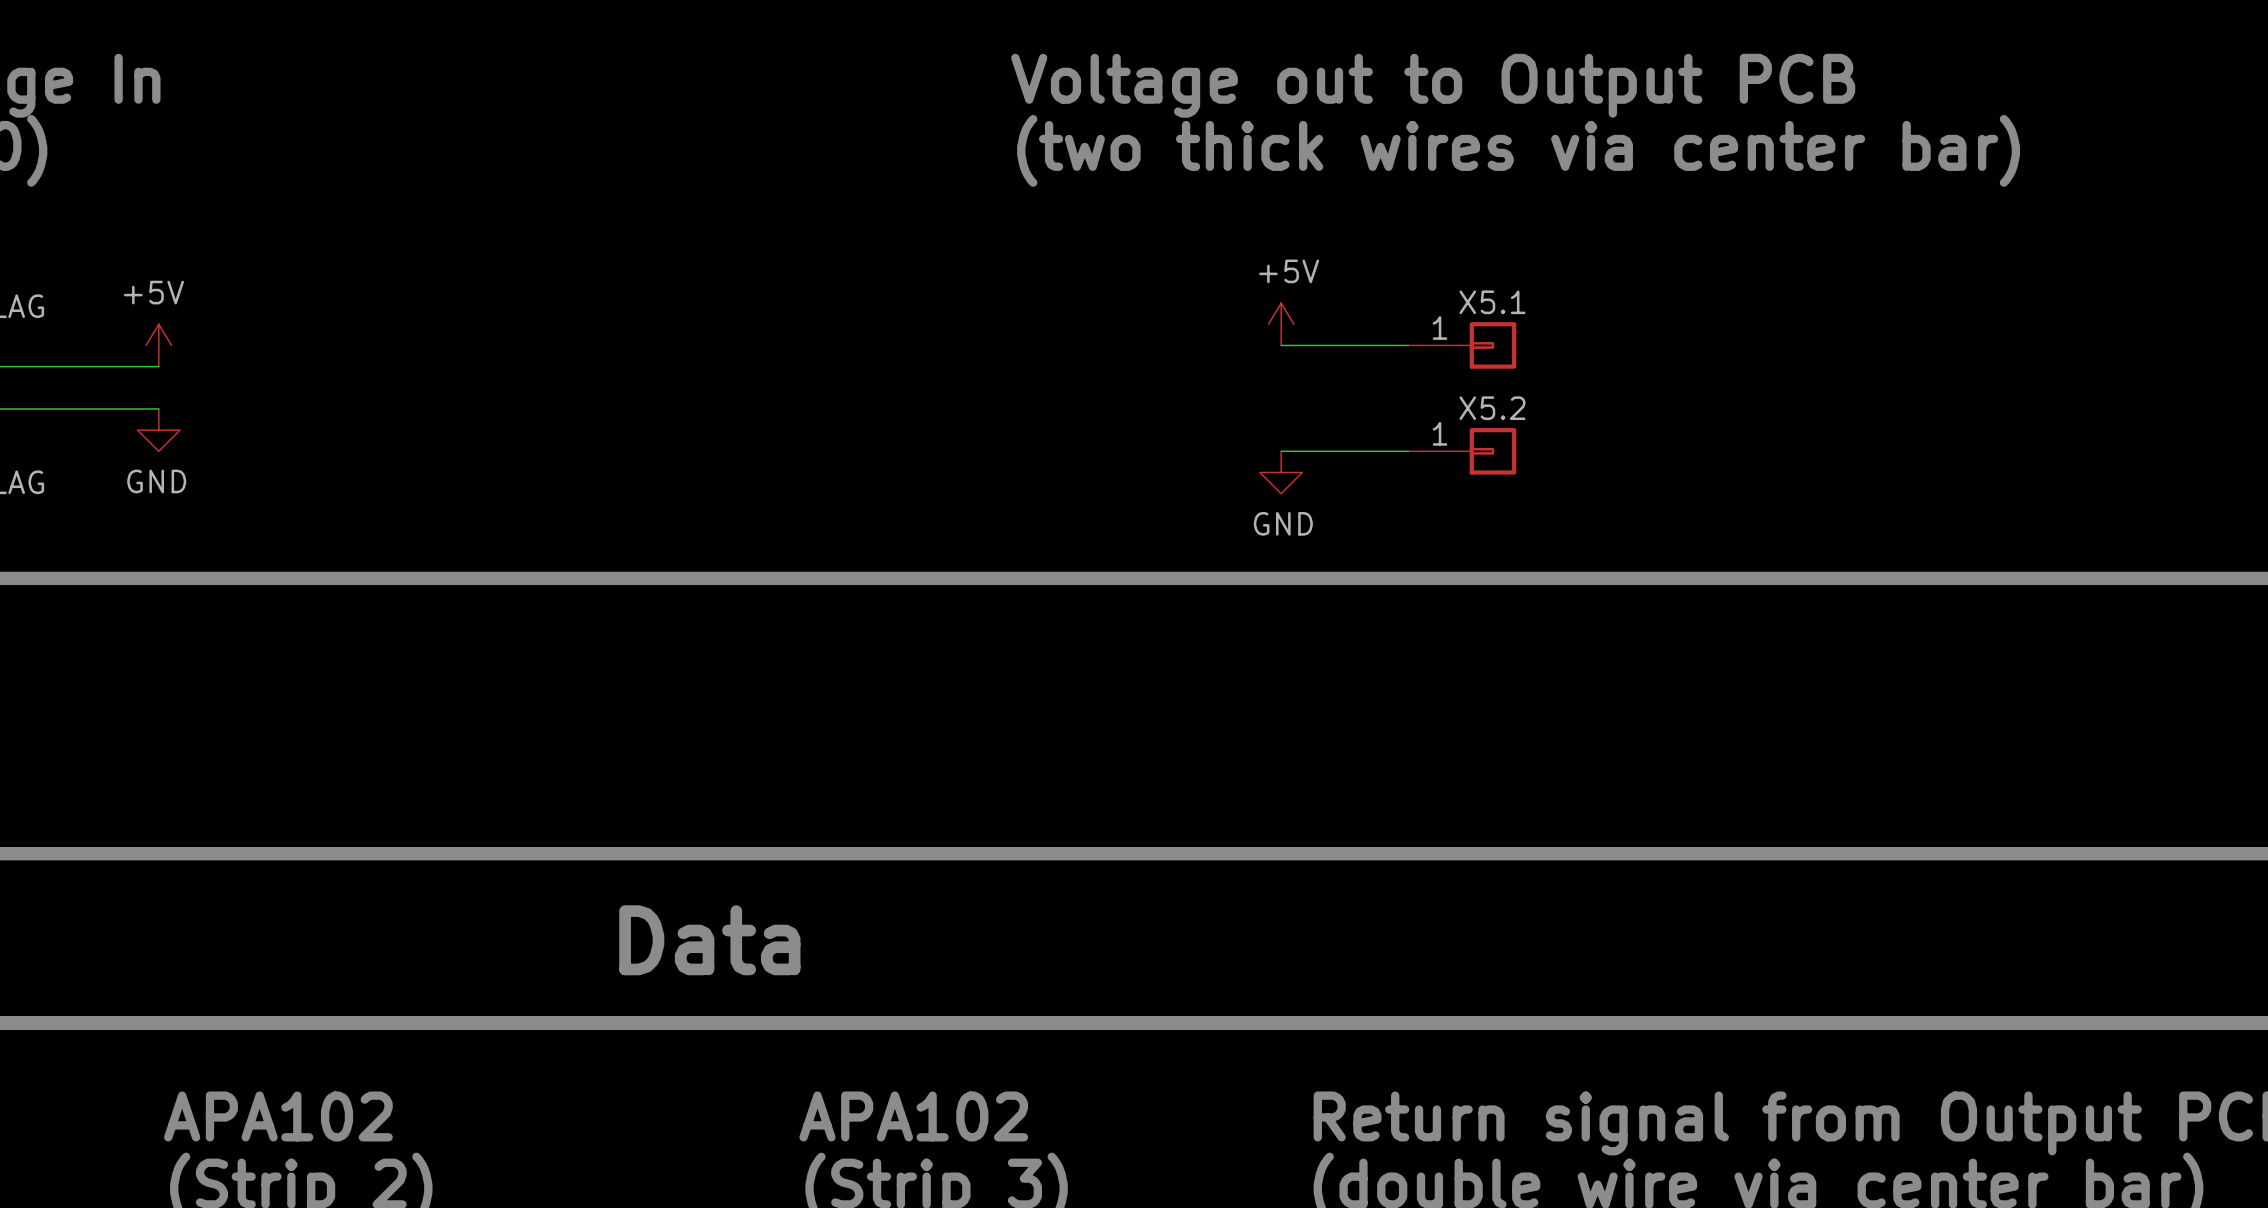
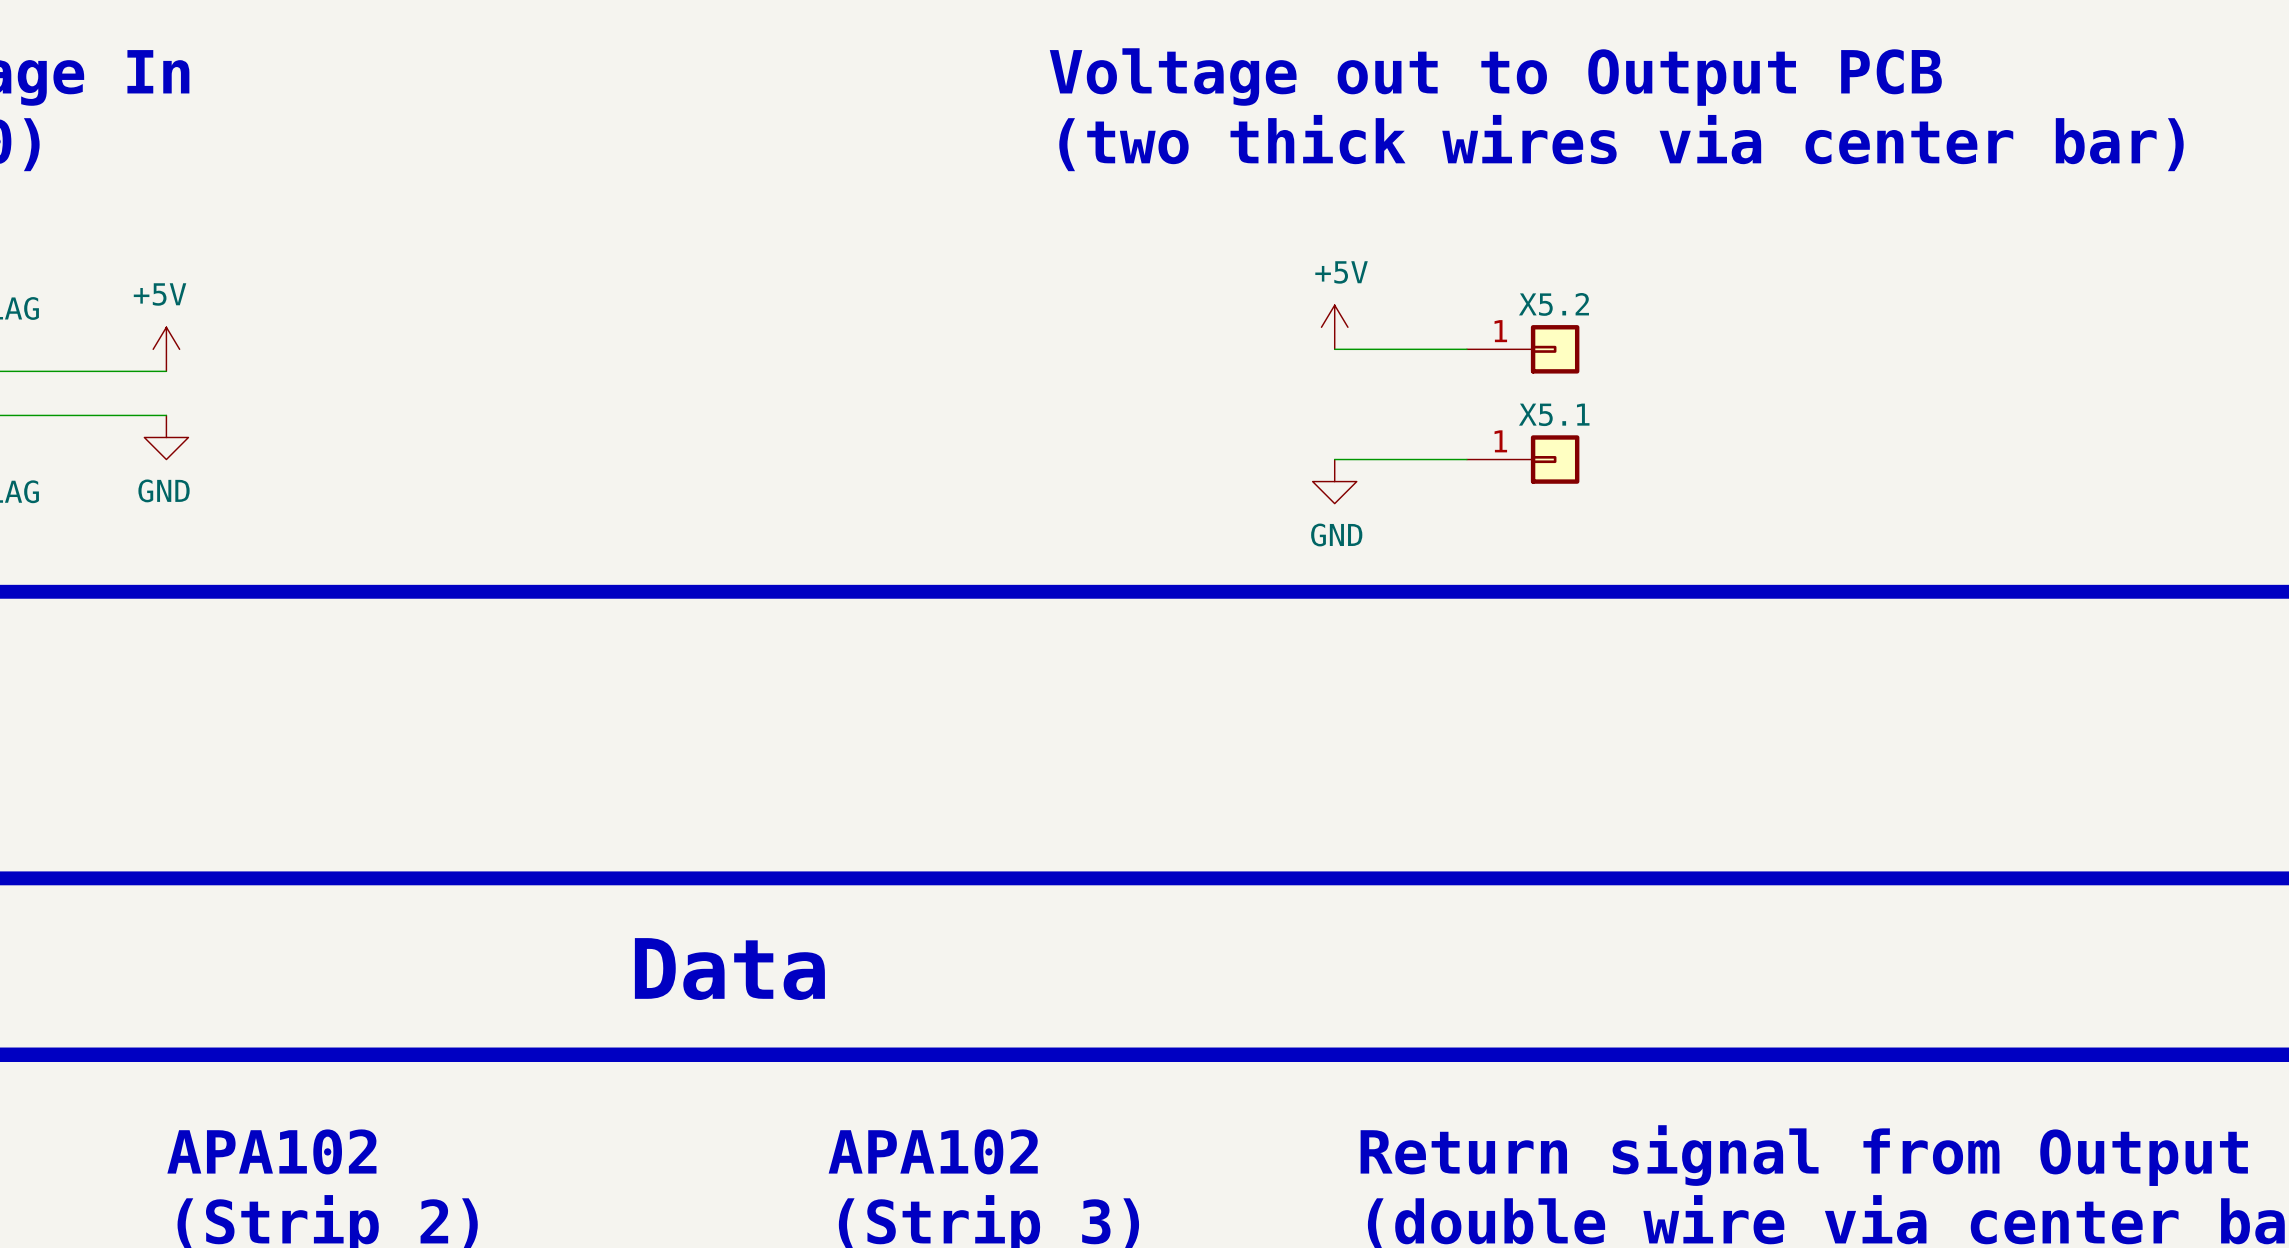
X5.1 name: X5.1 (1492, 302) -> X5.2 (1553, 304)
X5.2 name: X5.2 (1492, 408) -> X5.1 (1554, 414)

